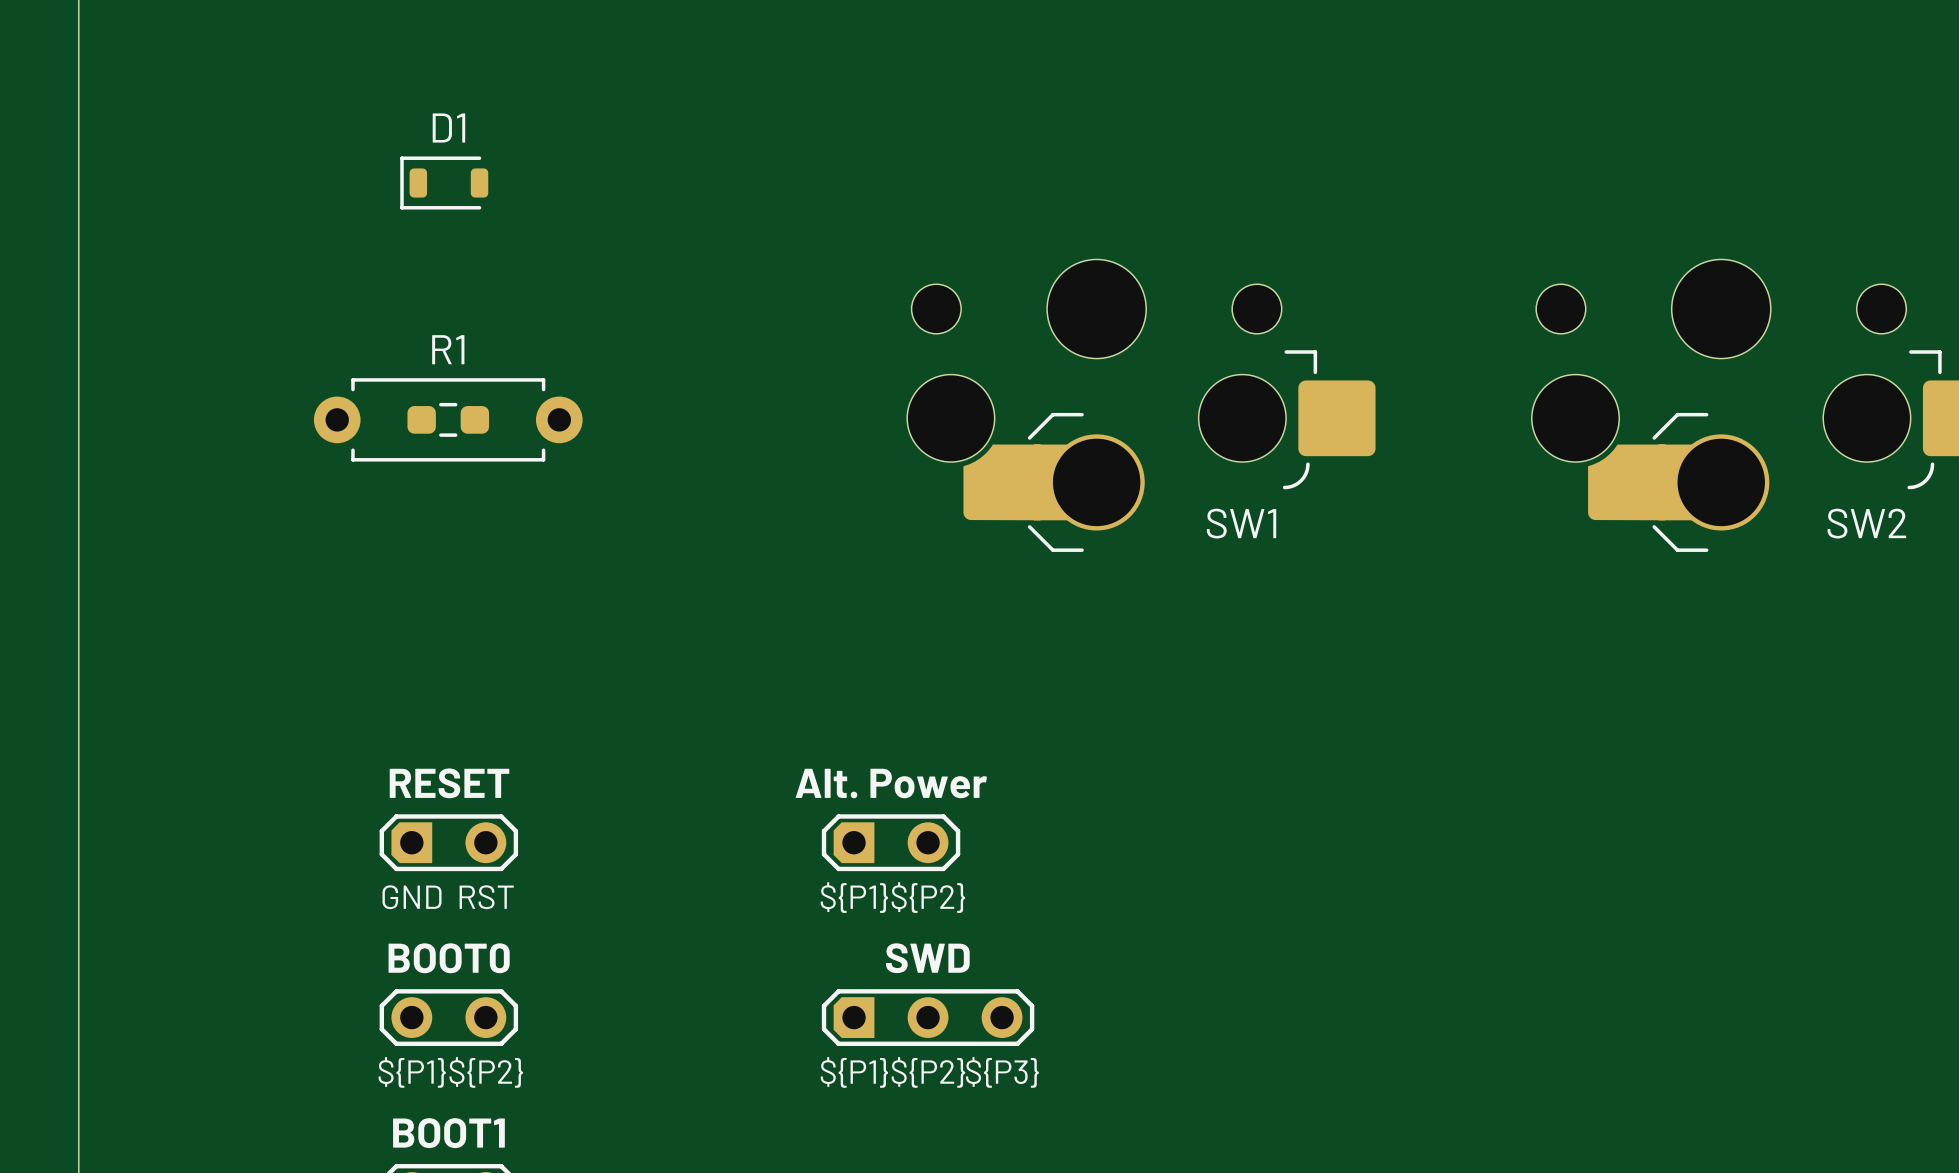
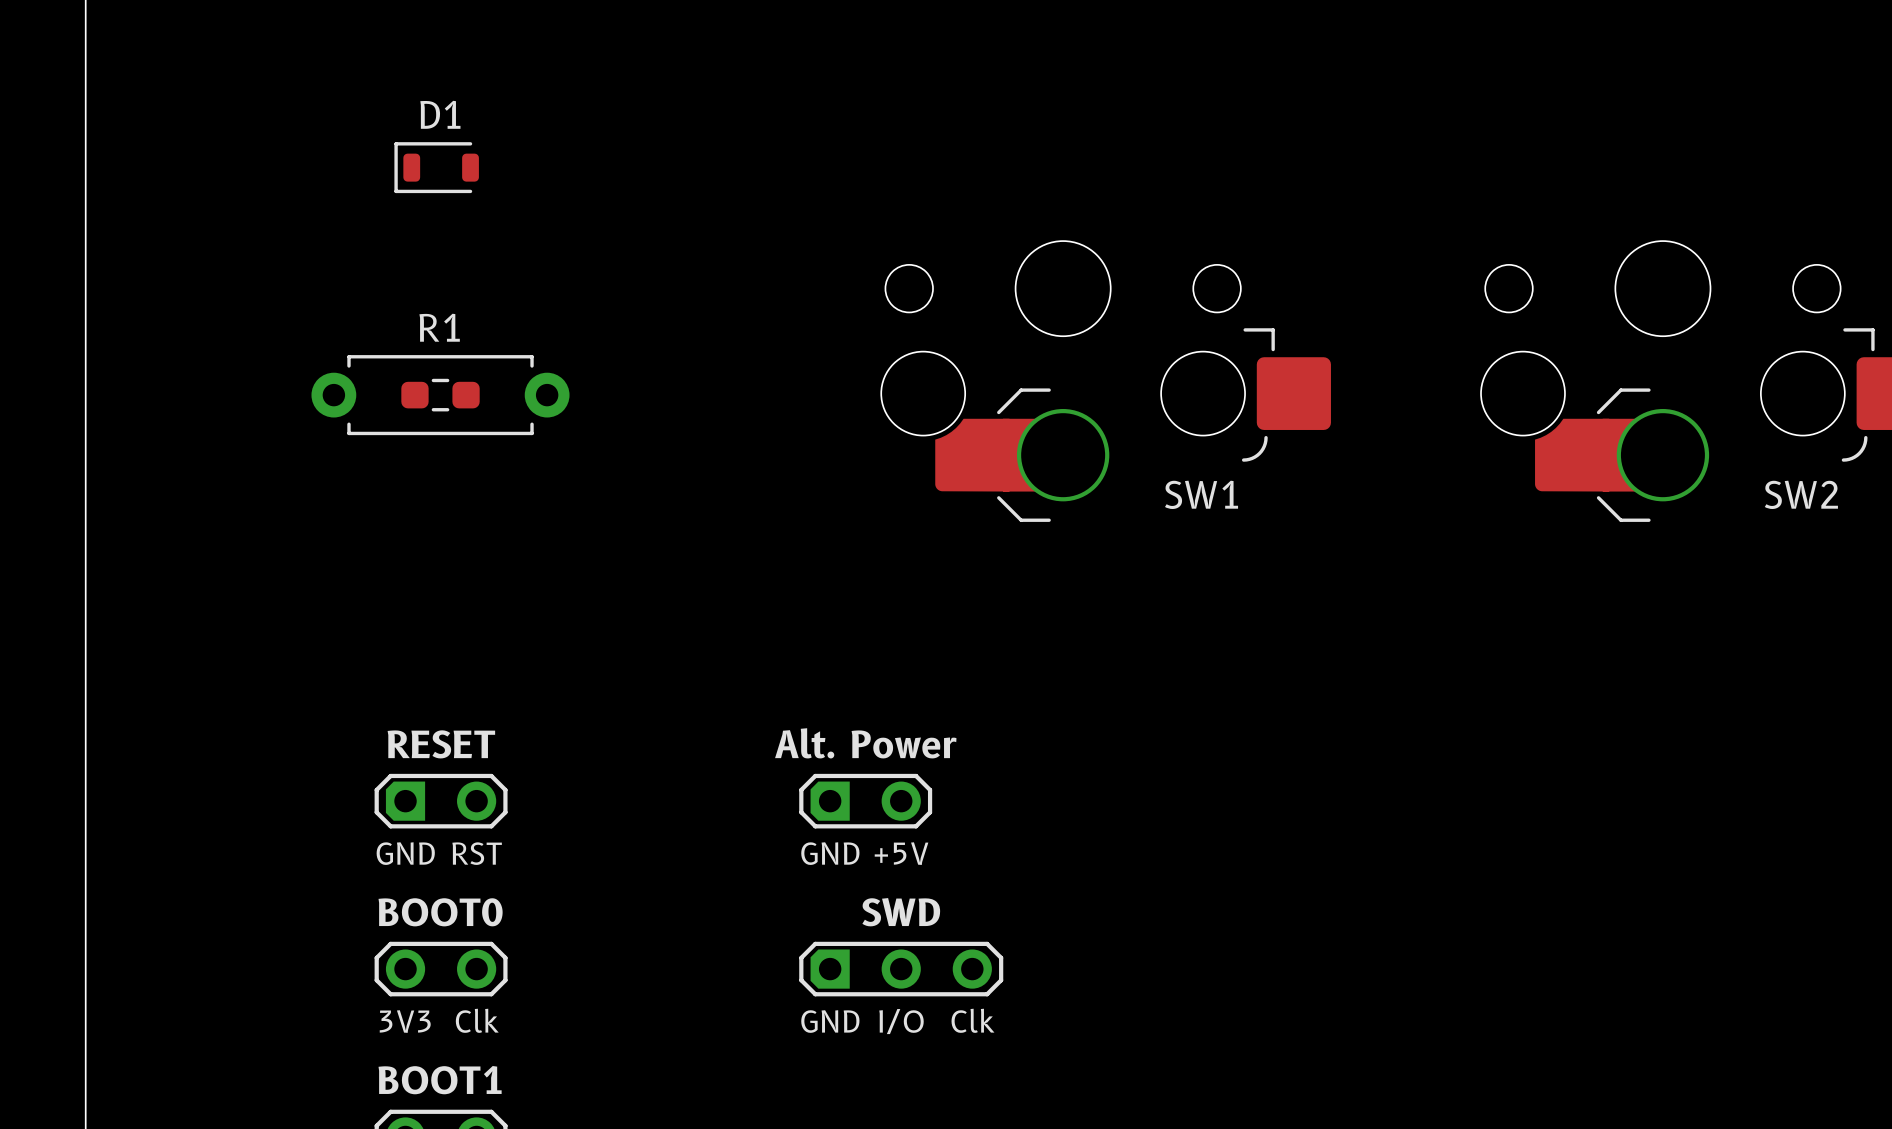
part text: ${P1} (854, 897) -> GND (830, 853)
part text: ${P2} (928, 897) -> +5V (901, 853)
part text: ${P1} (412, 1072) -> 3V3 (405, 1021)
part text: ${P2} (486, 1072) -> Clk (477, 1020)
part text: ${P1} (854, 1072) -> GND (830, 1021)
part text: ${P2} (928, 1072) -> I/O (901, 1021)
part text: ${P3} (1002, 1072) -> Clk (972, 1020)

